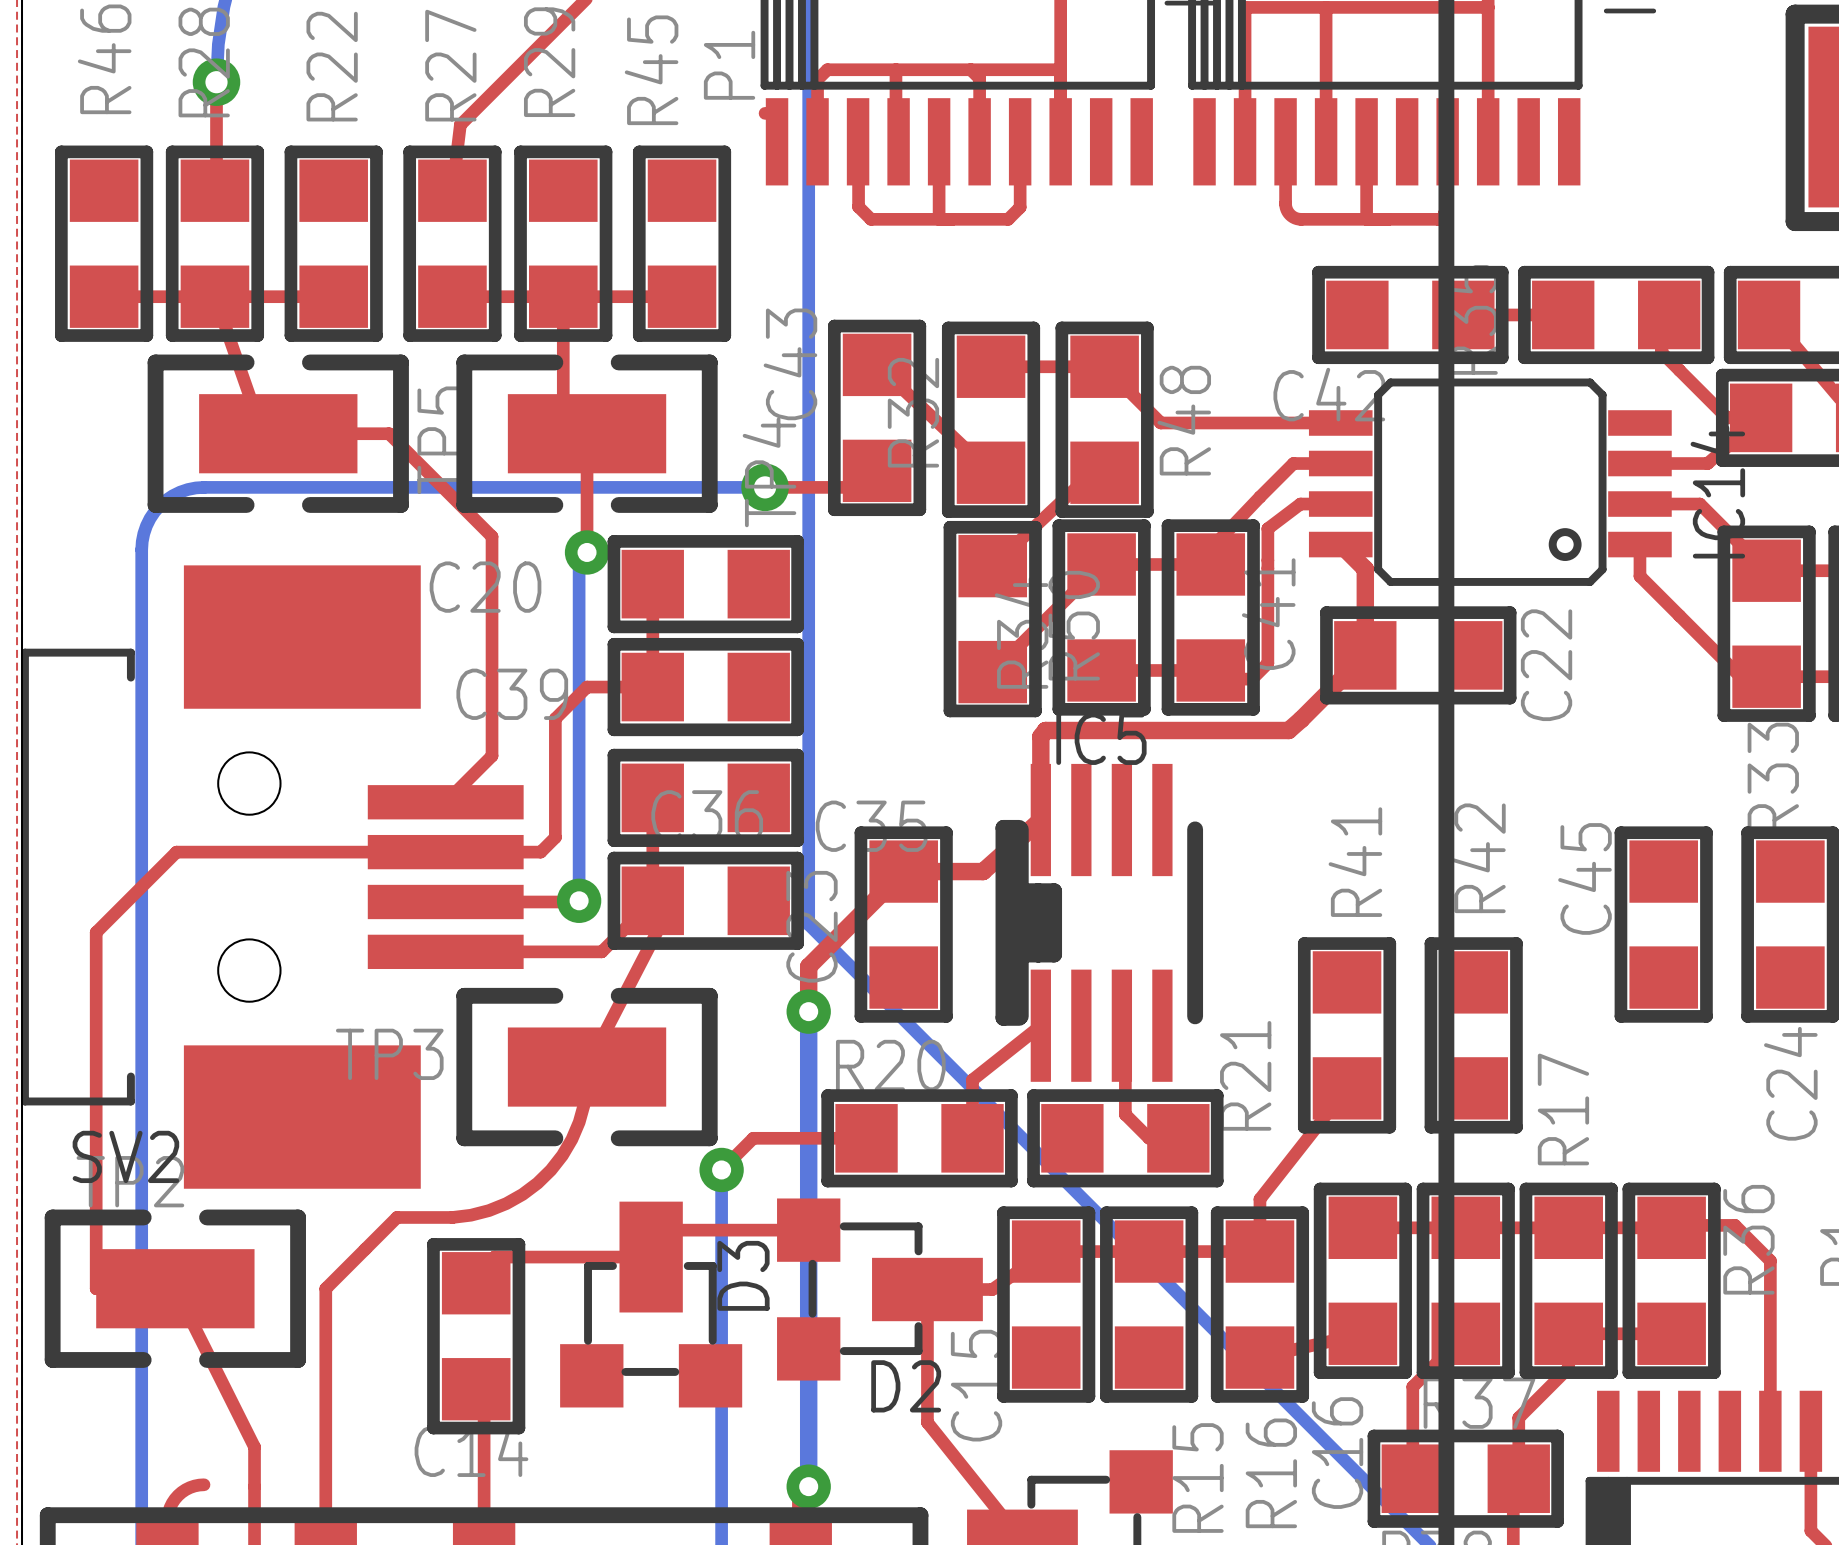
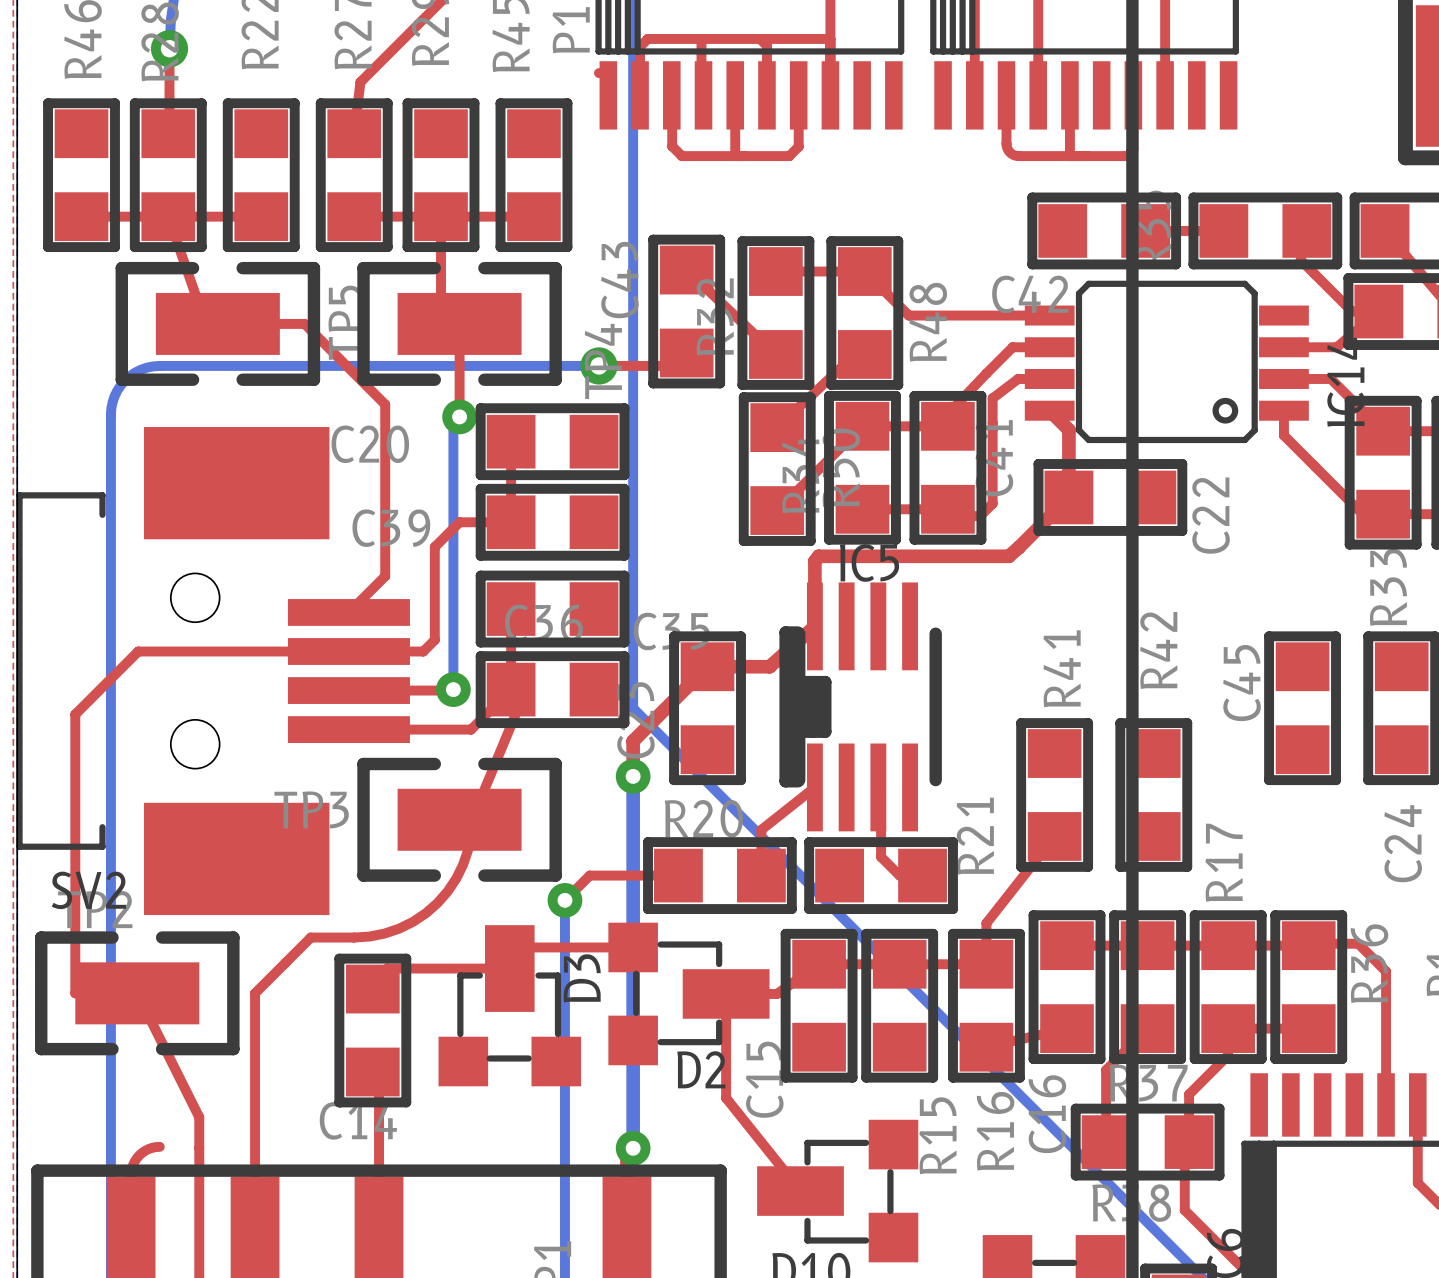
top track: (666, 914) (587, 1067) (586, 1085) (579, 1122) (562, 1155) (550, 1170) (522, 1194) (489, 1210) (452, 1217) -> (521, 700) (471, 819) (467, 850) (463, 864) (447, 891) (425, 913) (399, 928) (369, 936) (354, 937)

